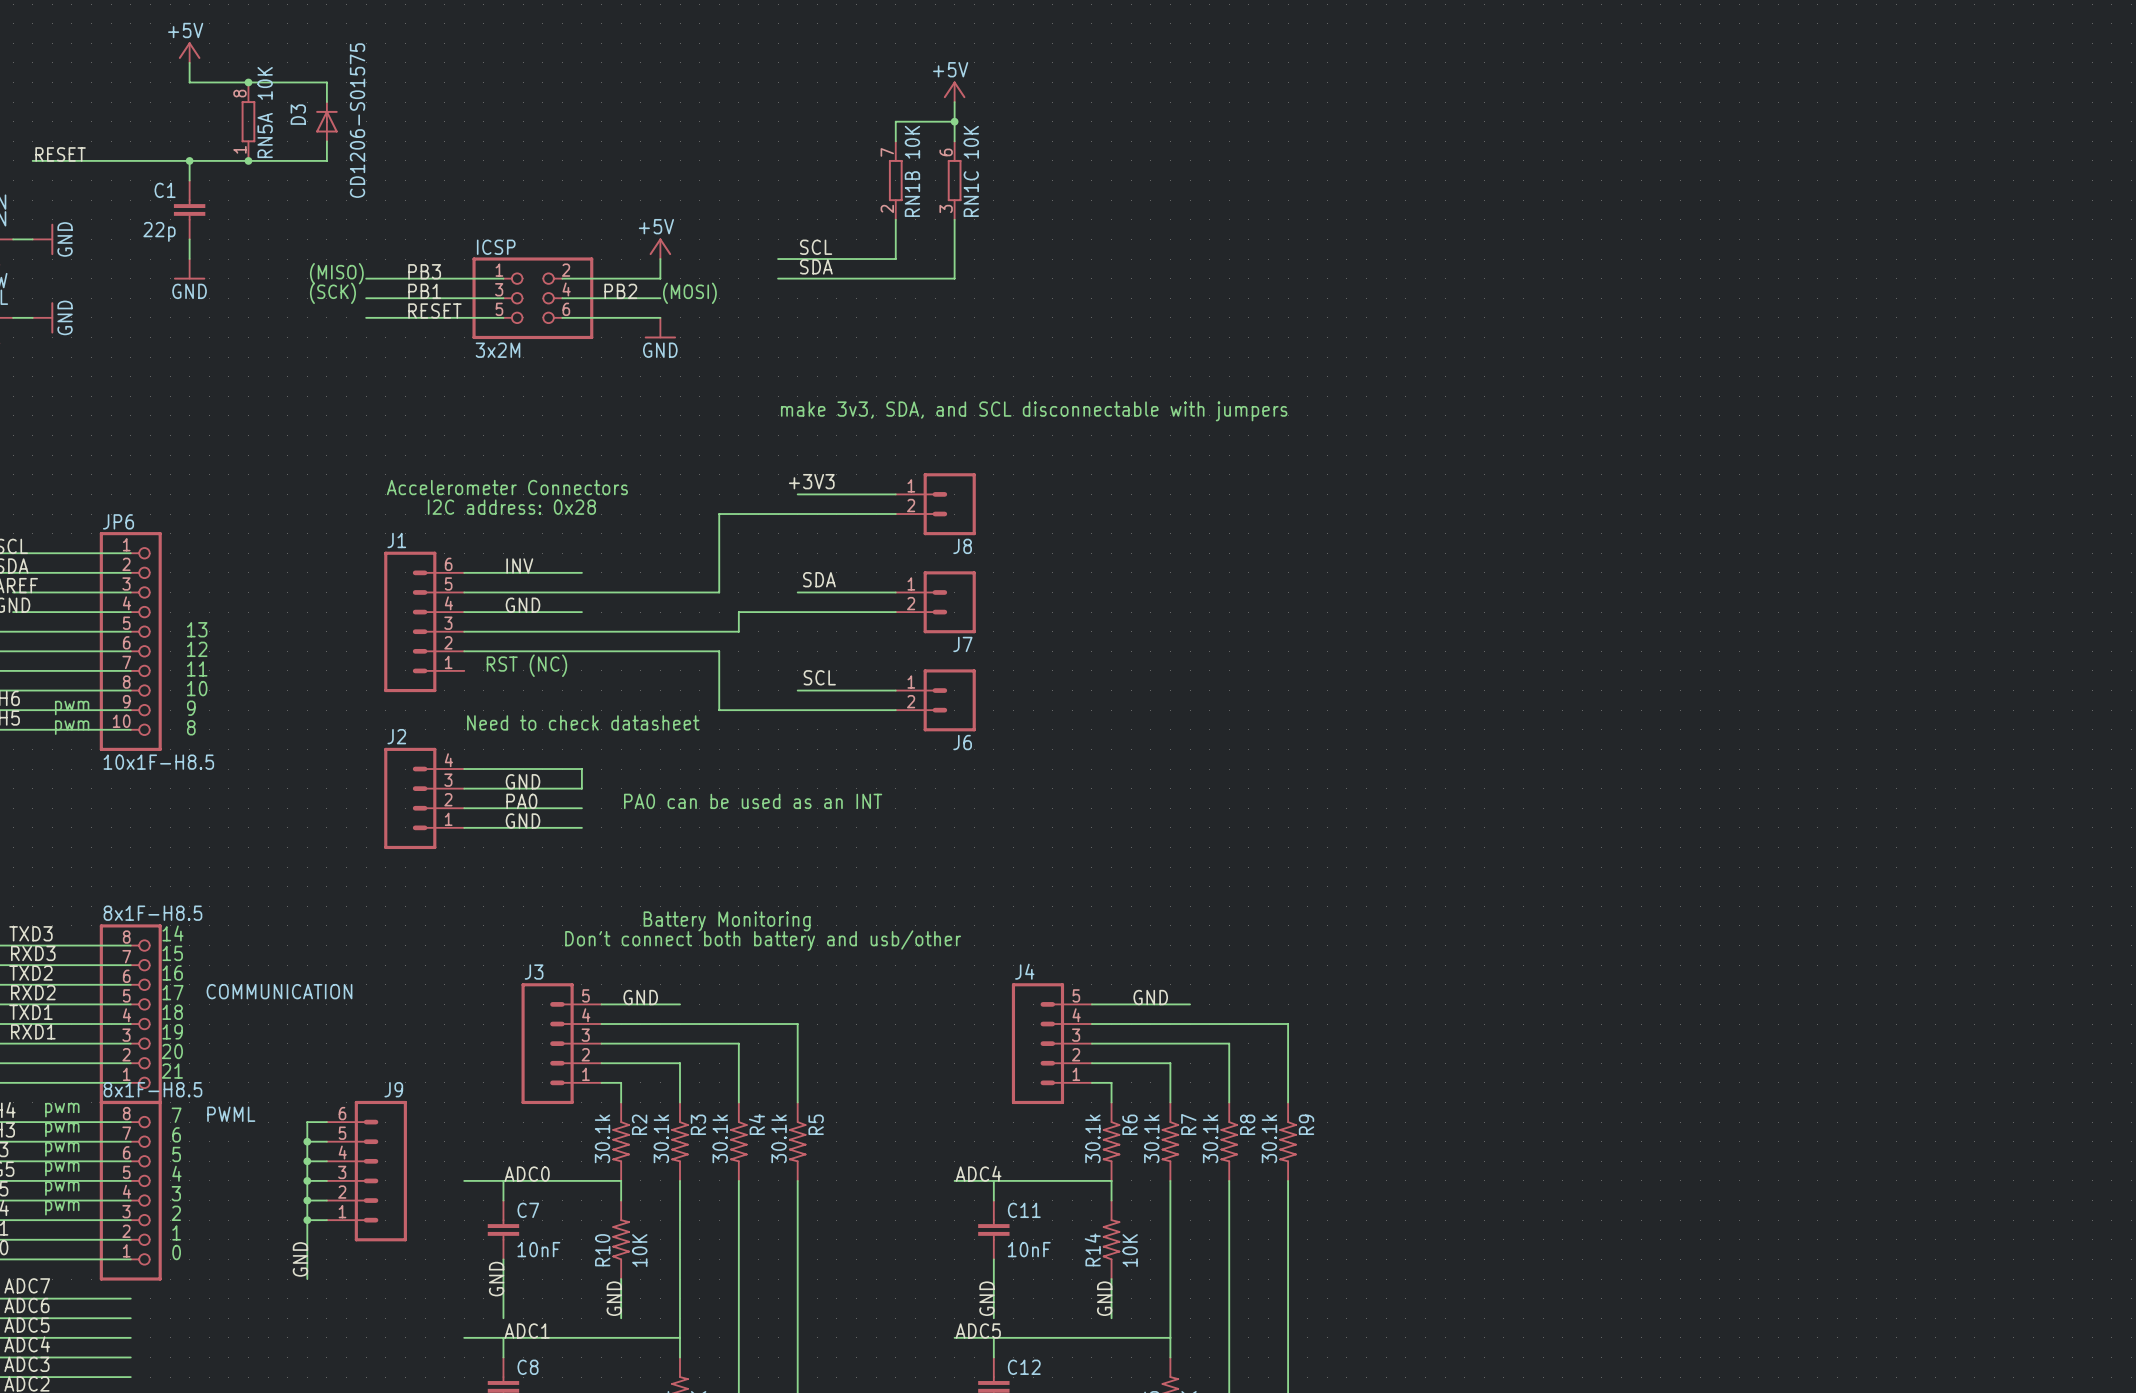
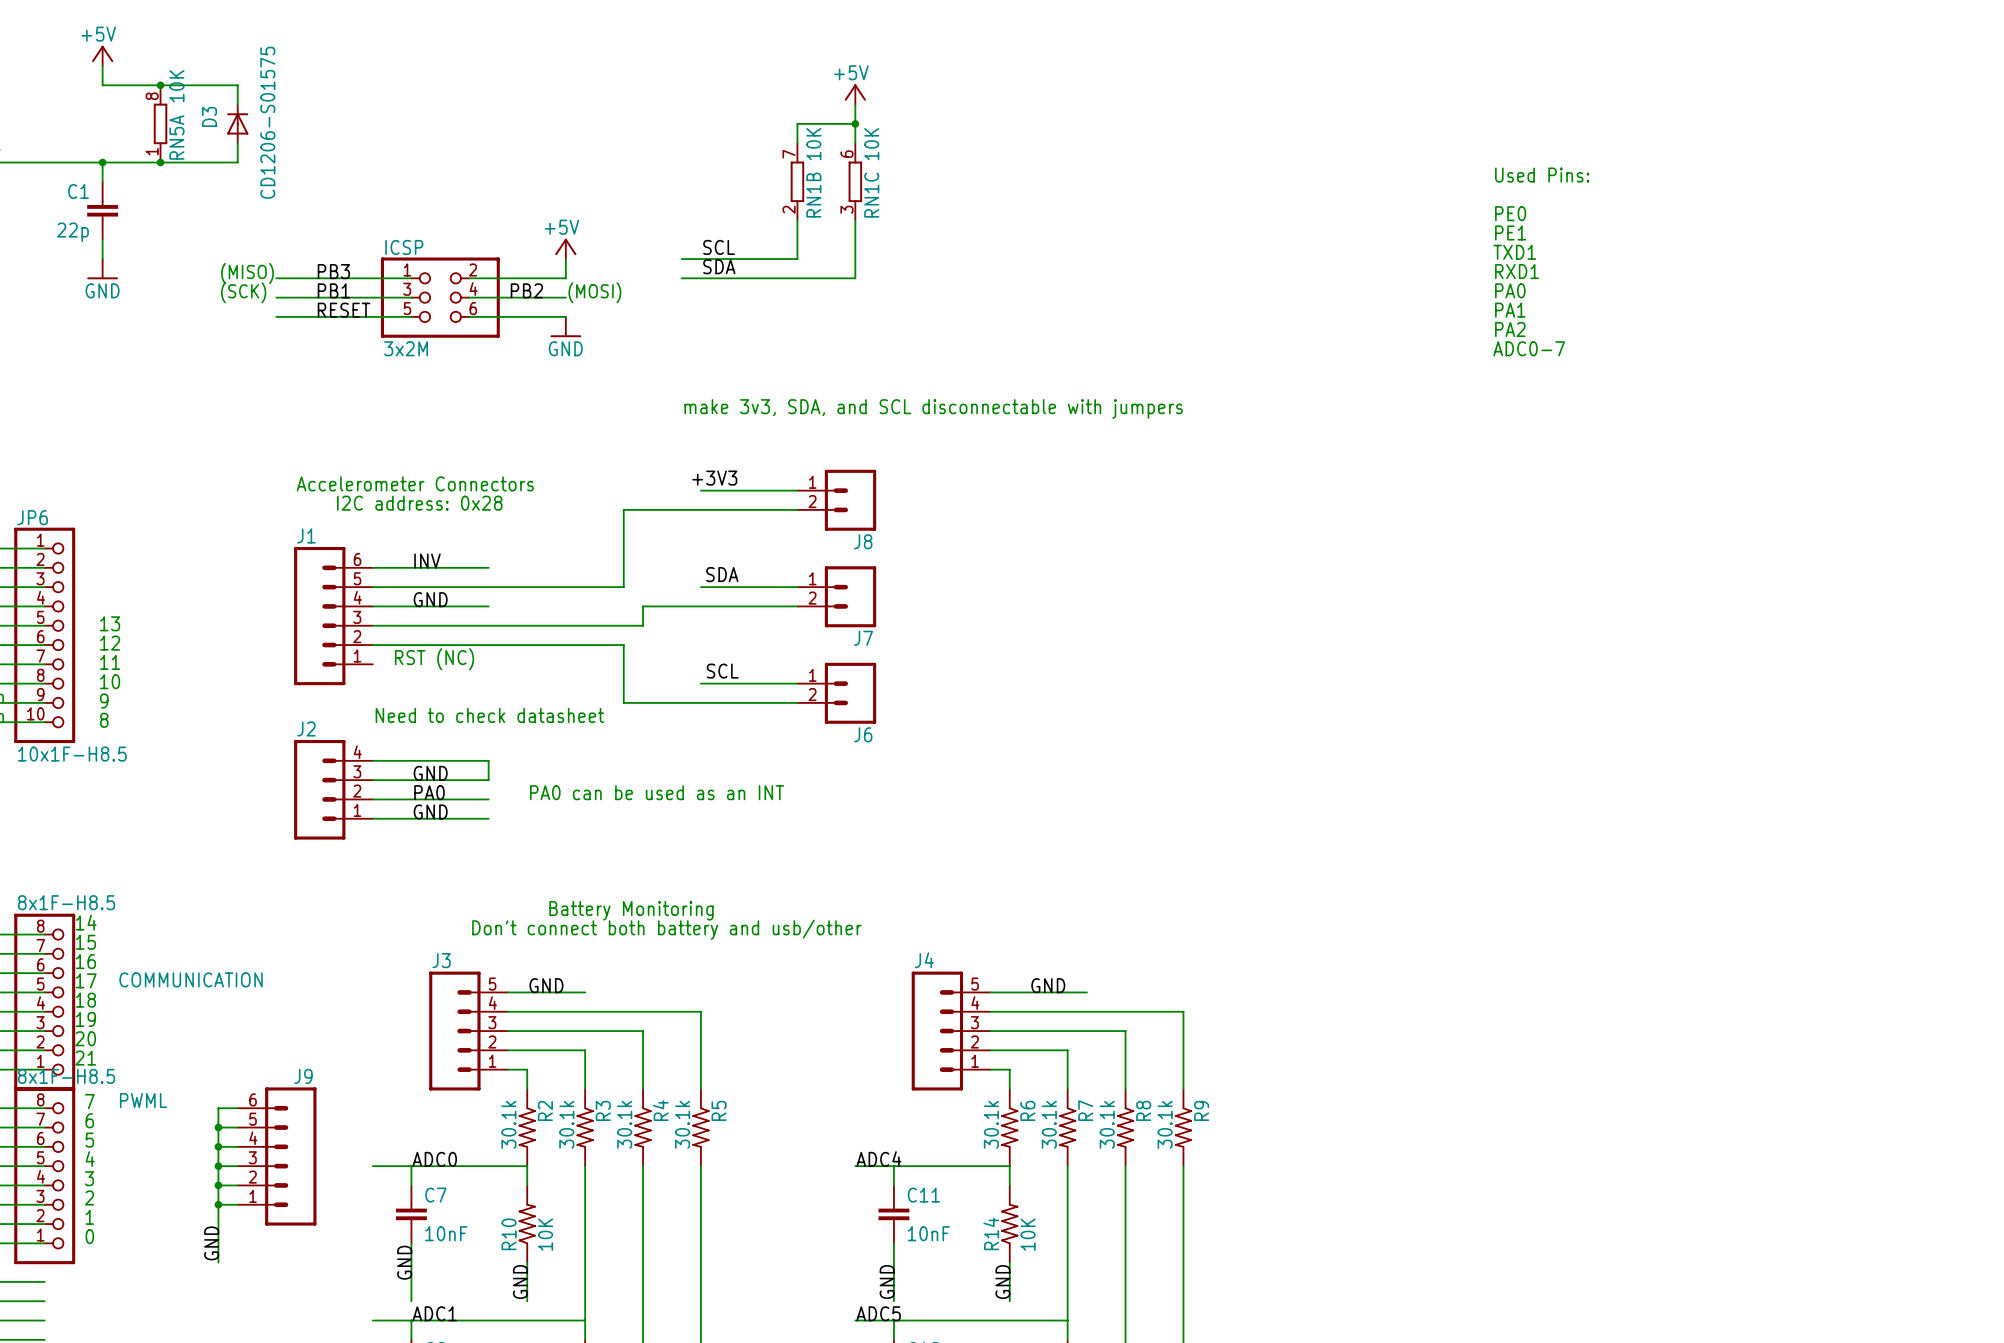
text: none -> Used Pins: (1542, 175)
text: none -> PE0 (1510, 213)
text: none -> PE1 (1510, 232)
text: none -> TXD1 (1514, 252)
text: none -> RXD1 (1516, 271)
text: none -> PA0 (1510, 290)
text: none -> PA1 (1510, 310)
text: none -> PA2 (1510, 329)
text: none -> ADC0-7 (1529, 348)

